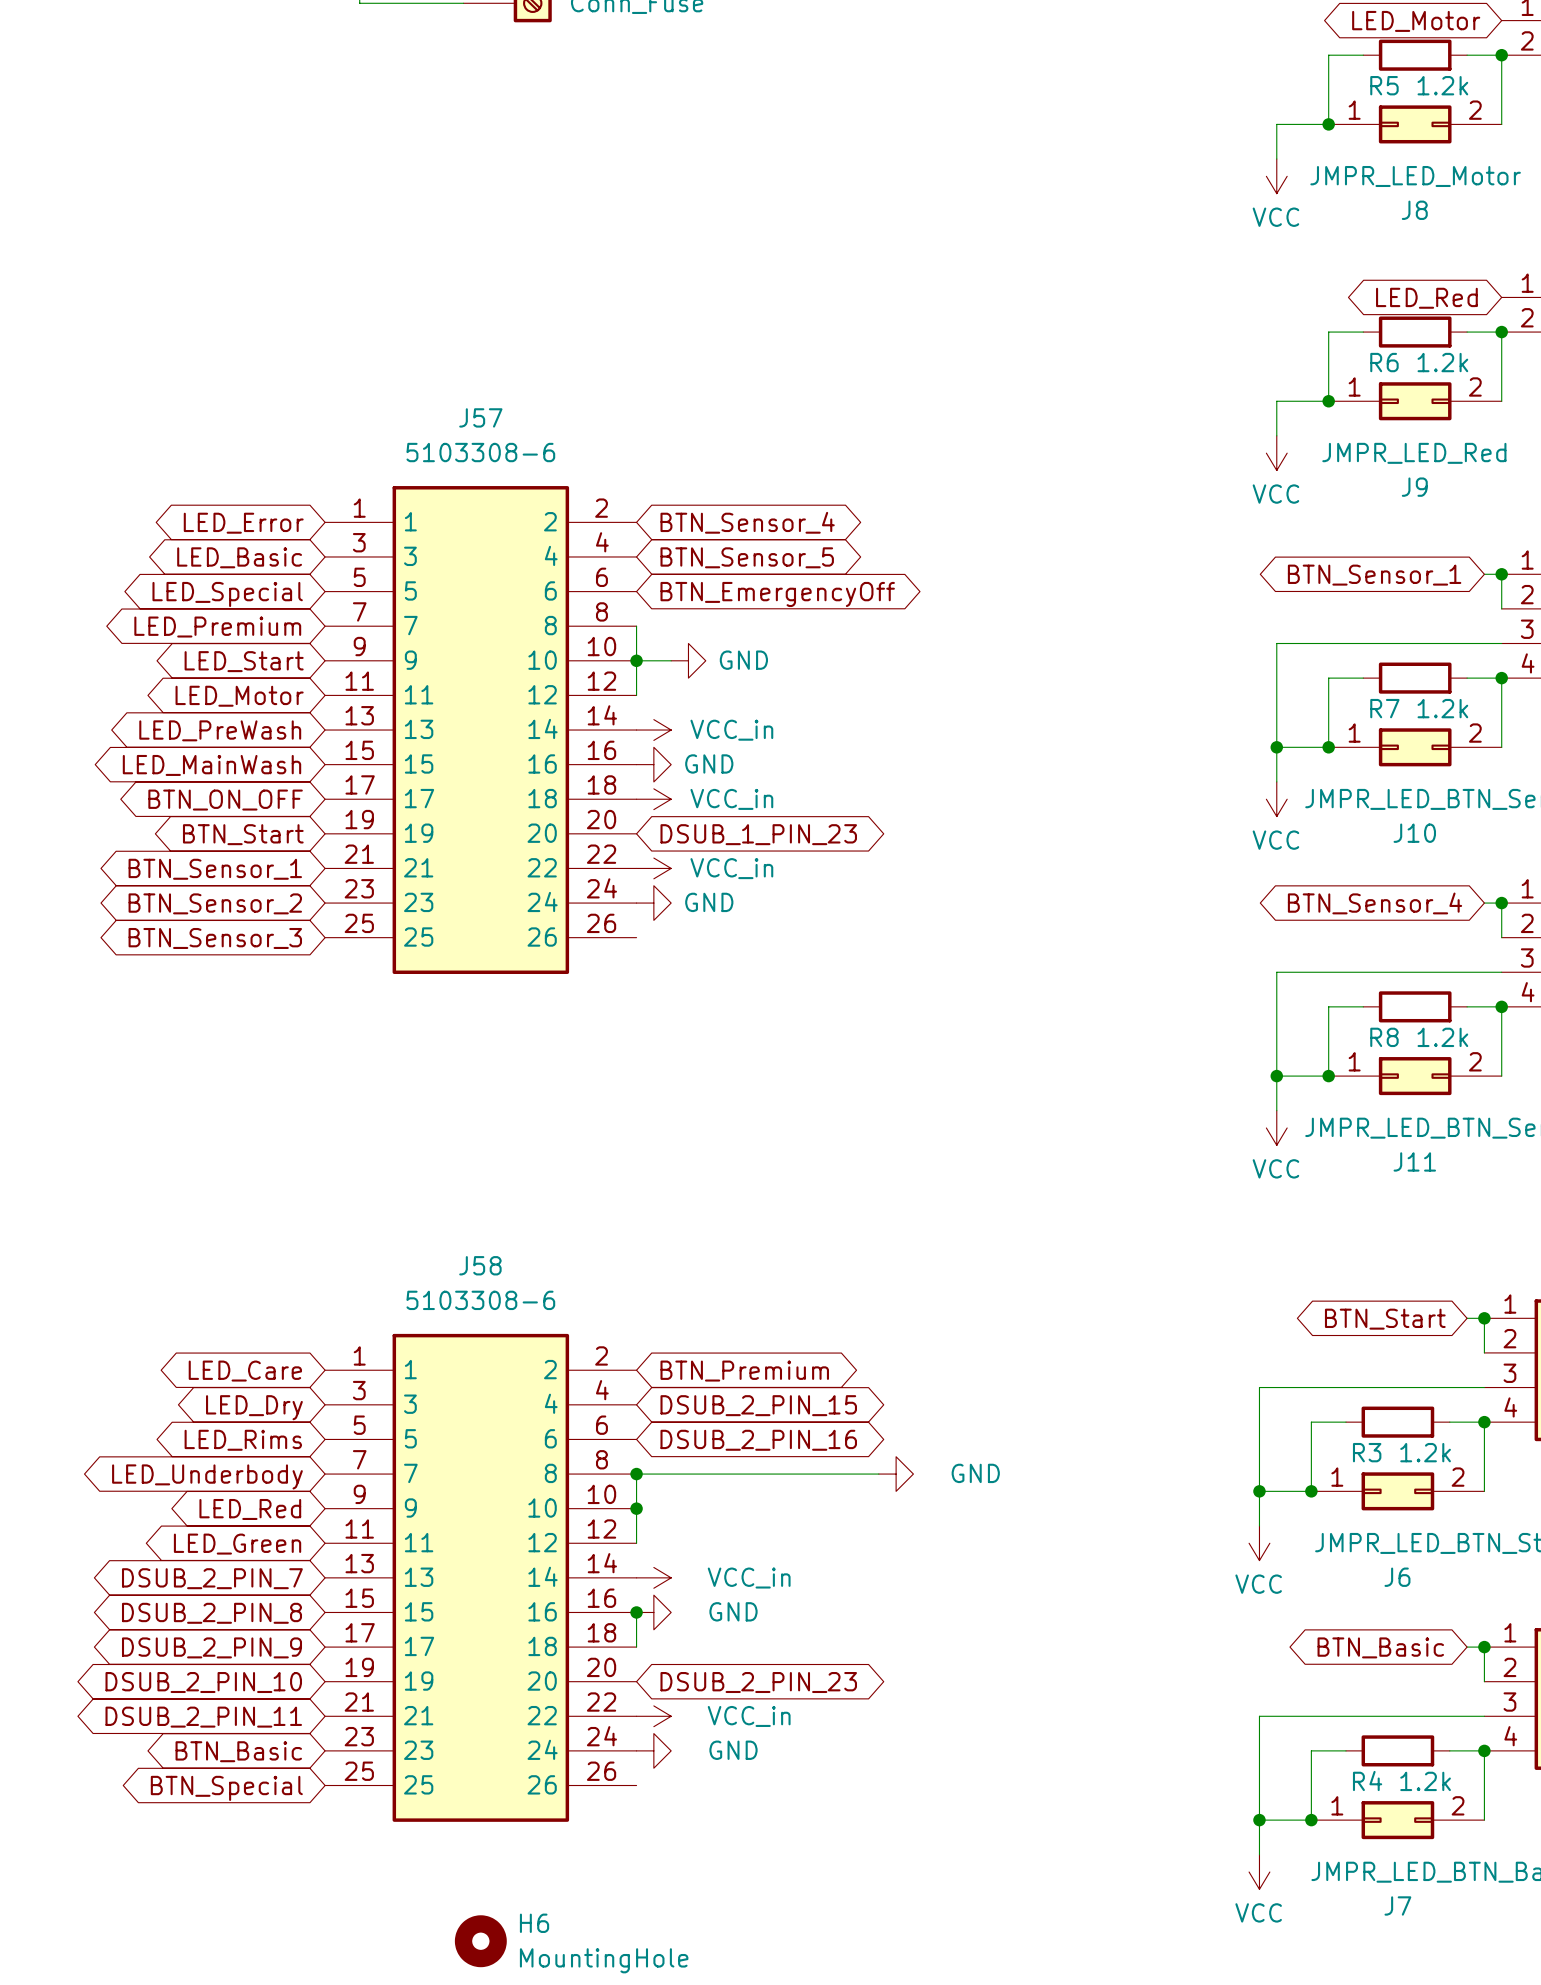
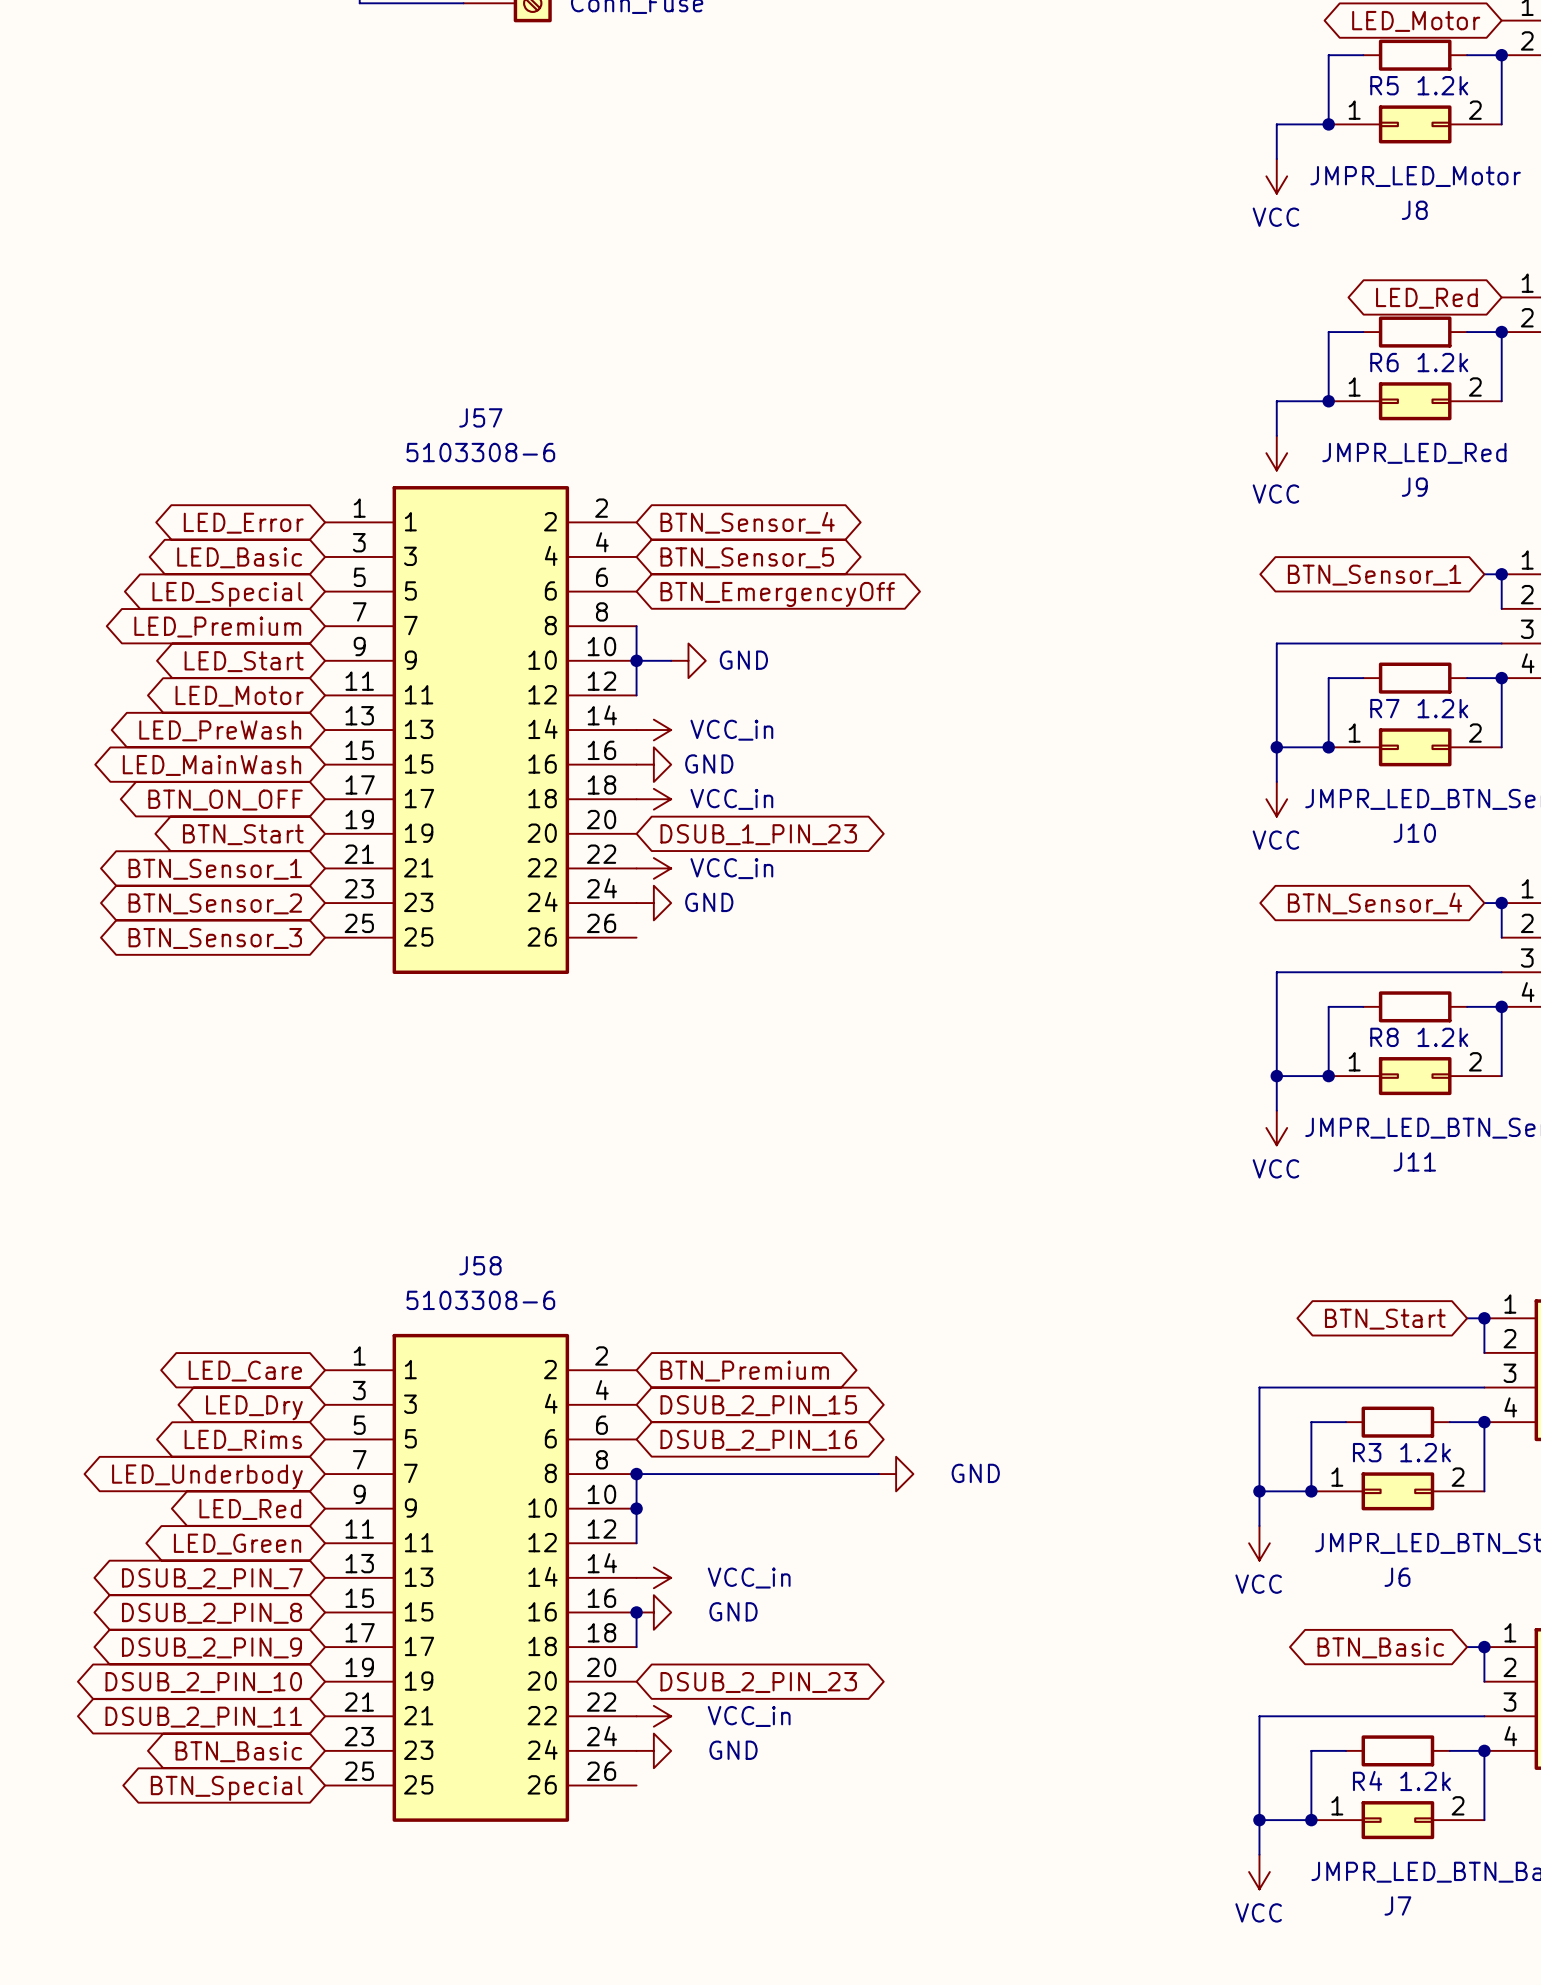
H6: MountingHole (480, 1941) -> none

